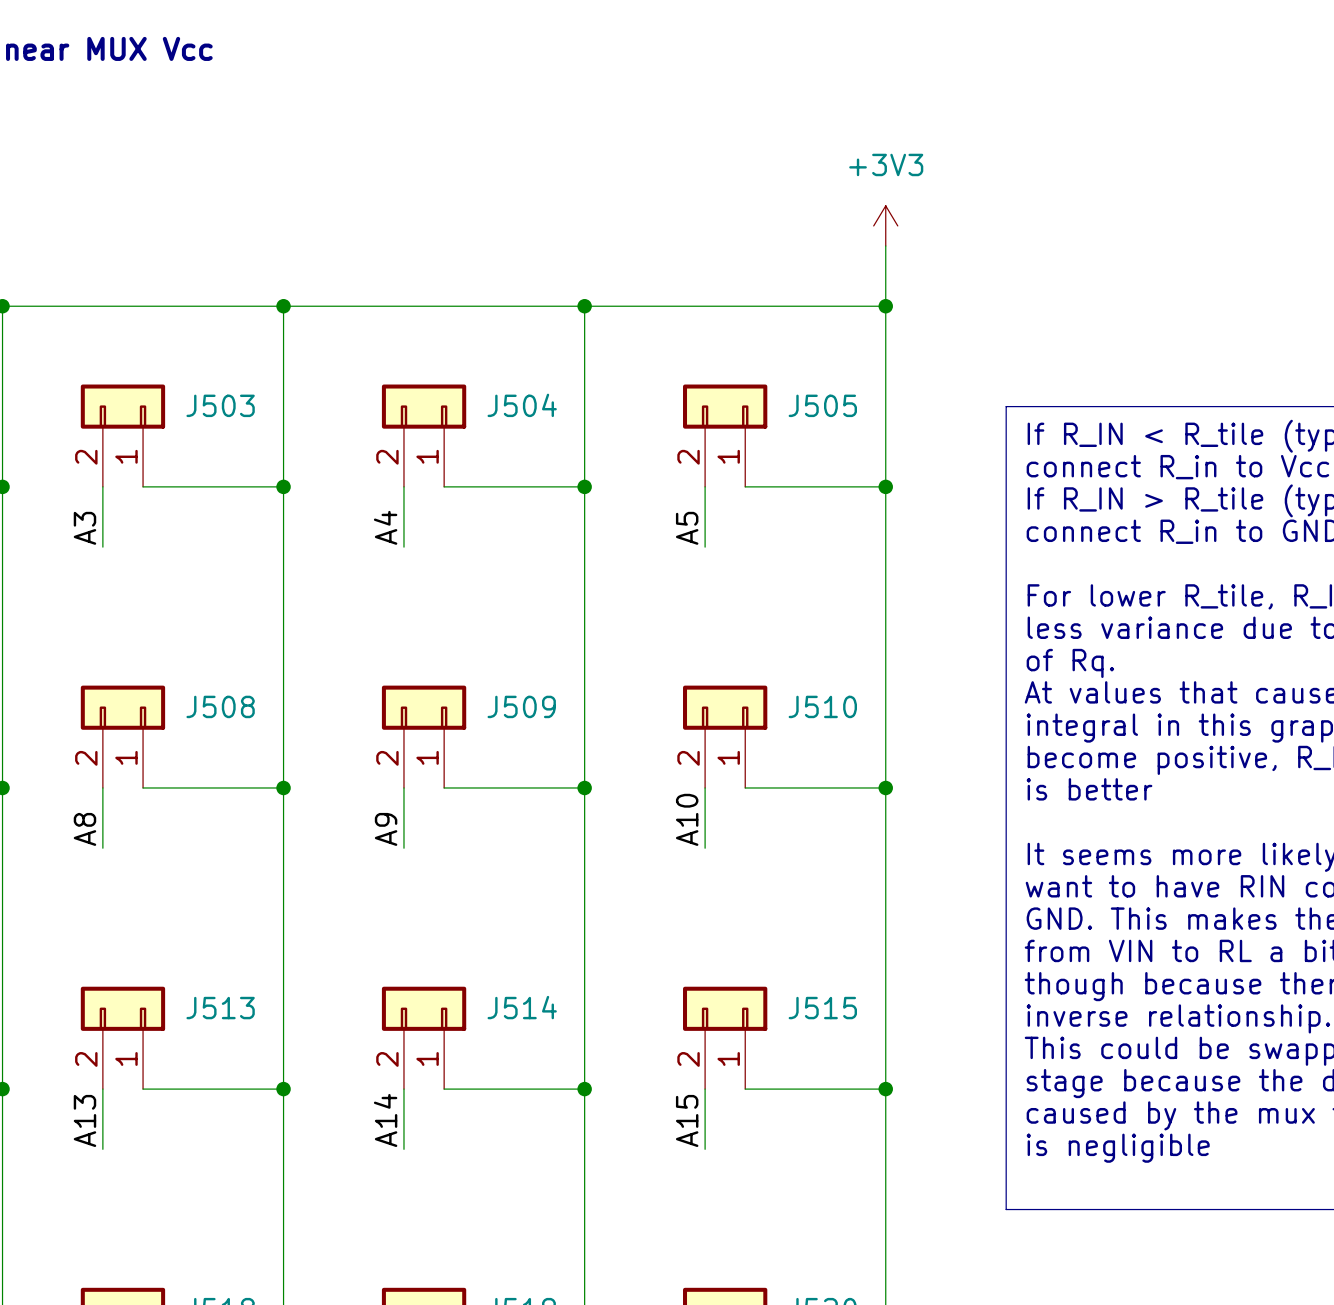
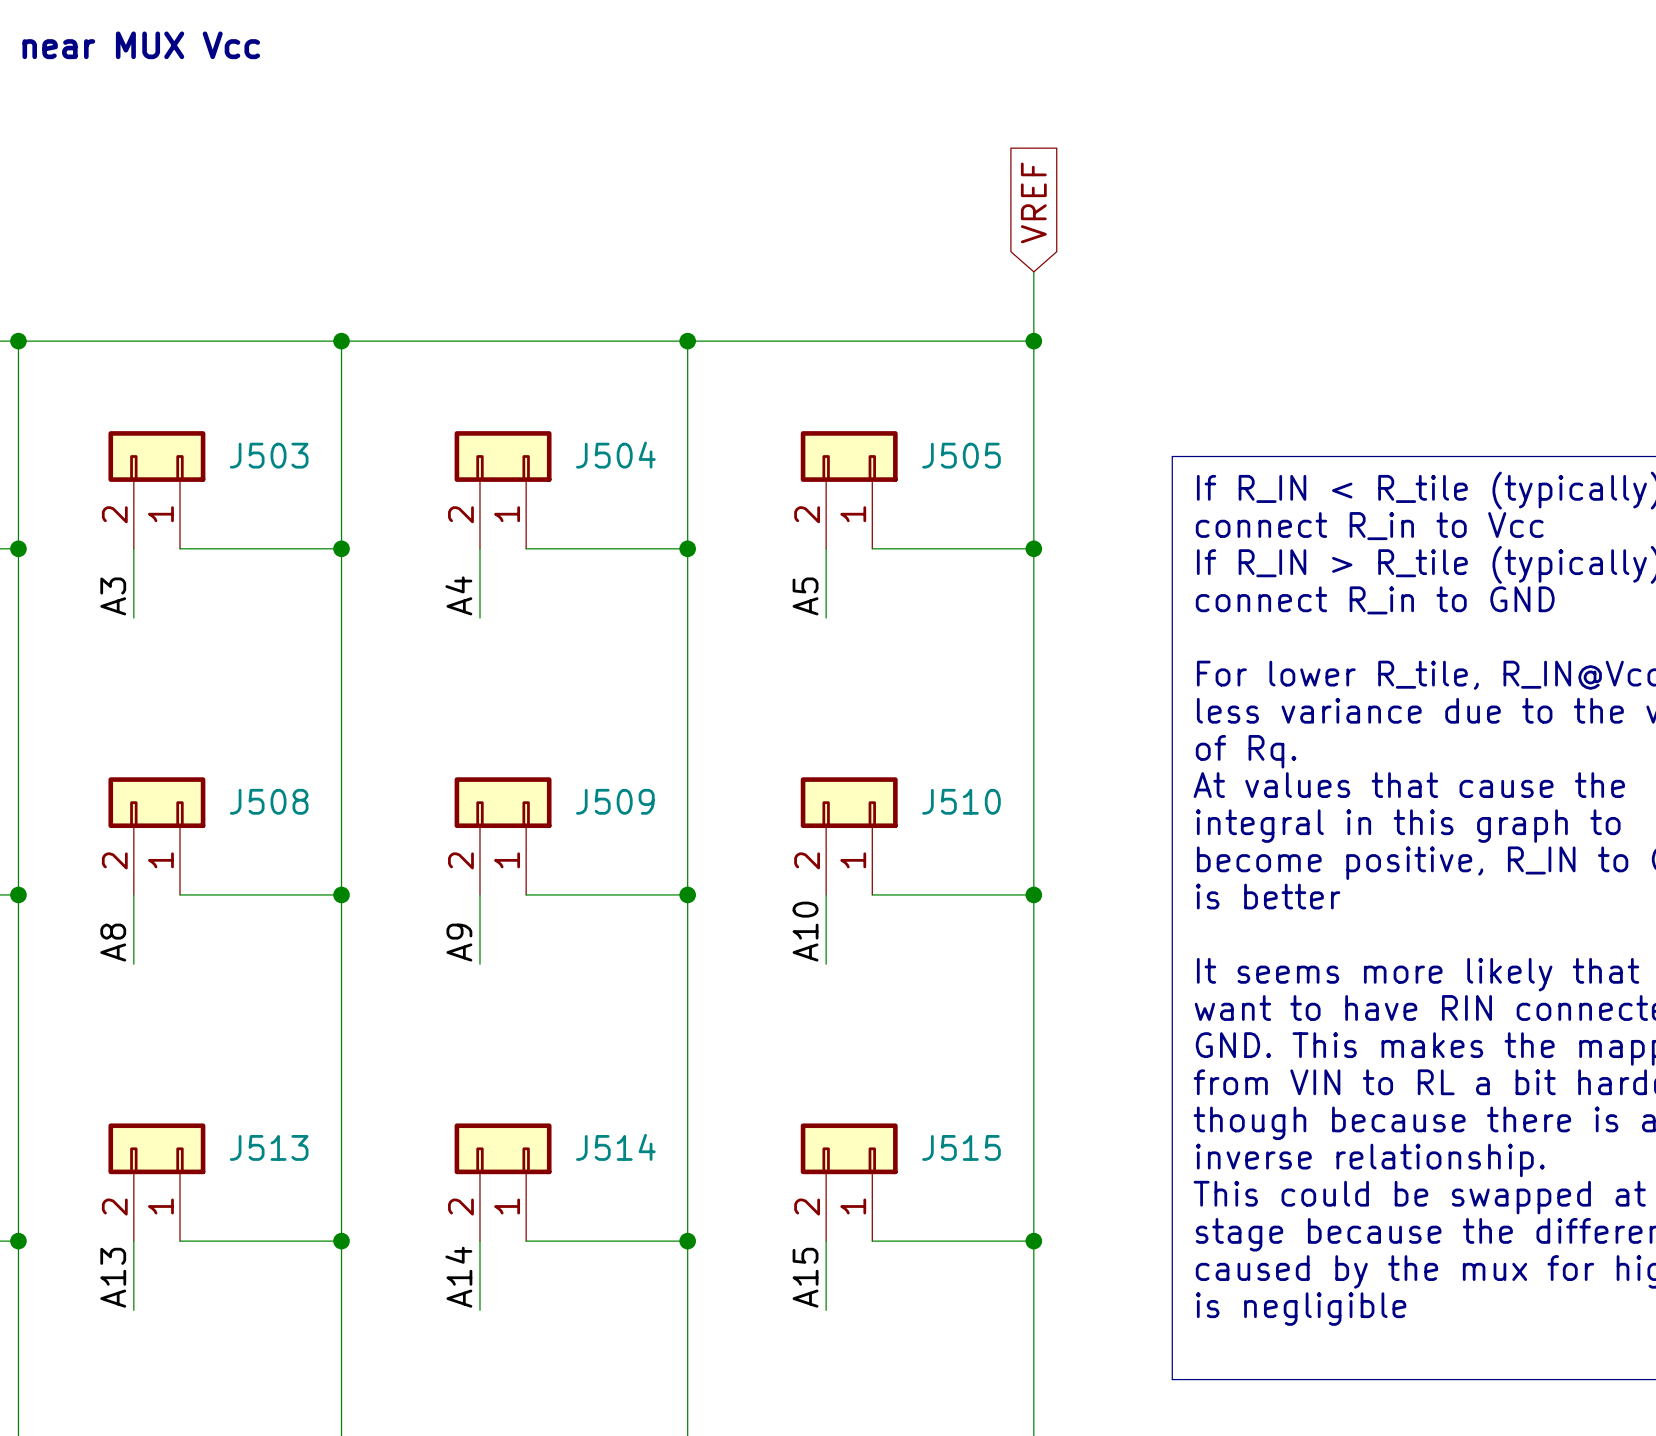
global label: none -> VREF (1033, 202)
power symbol: +3V3 (885, 225) -> none

